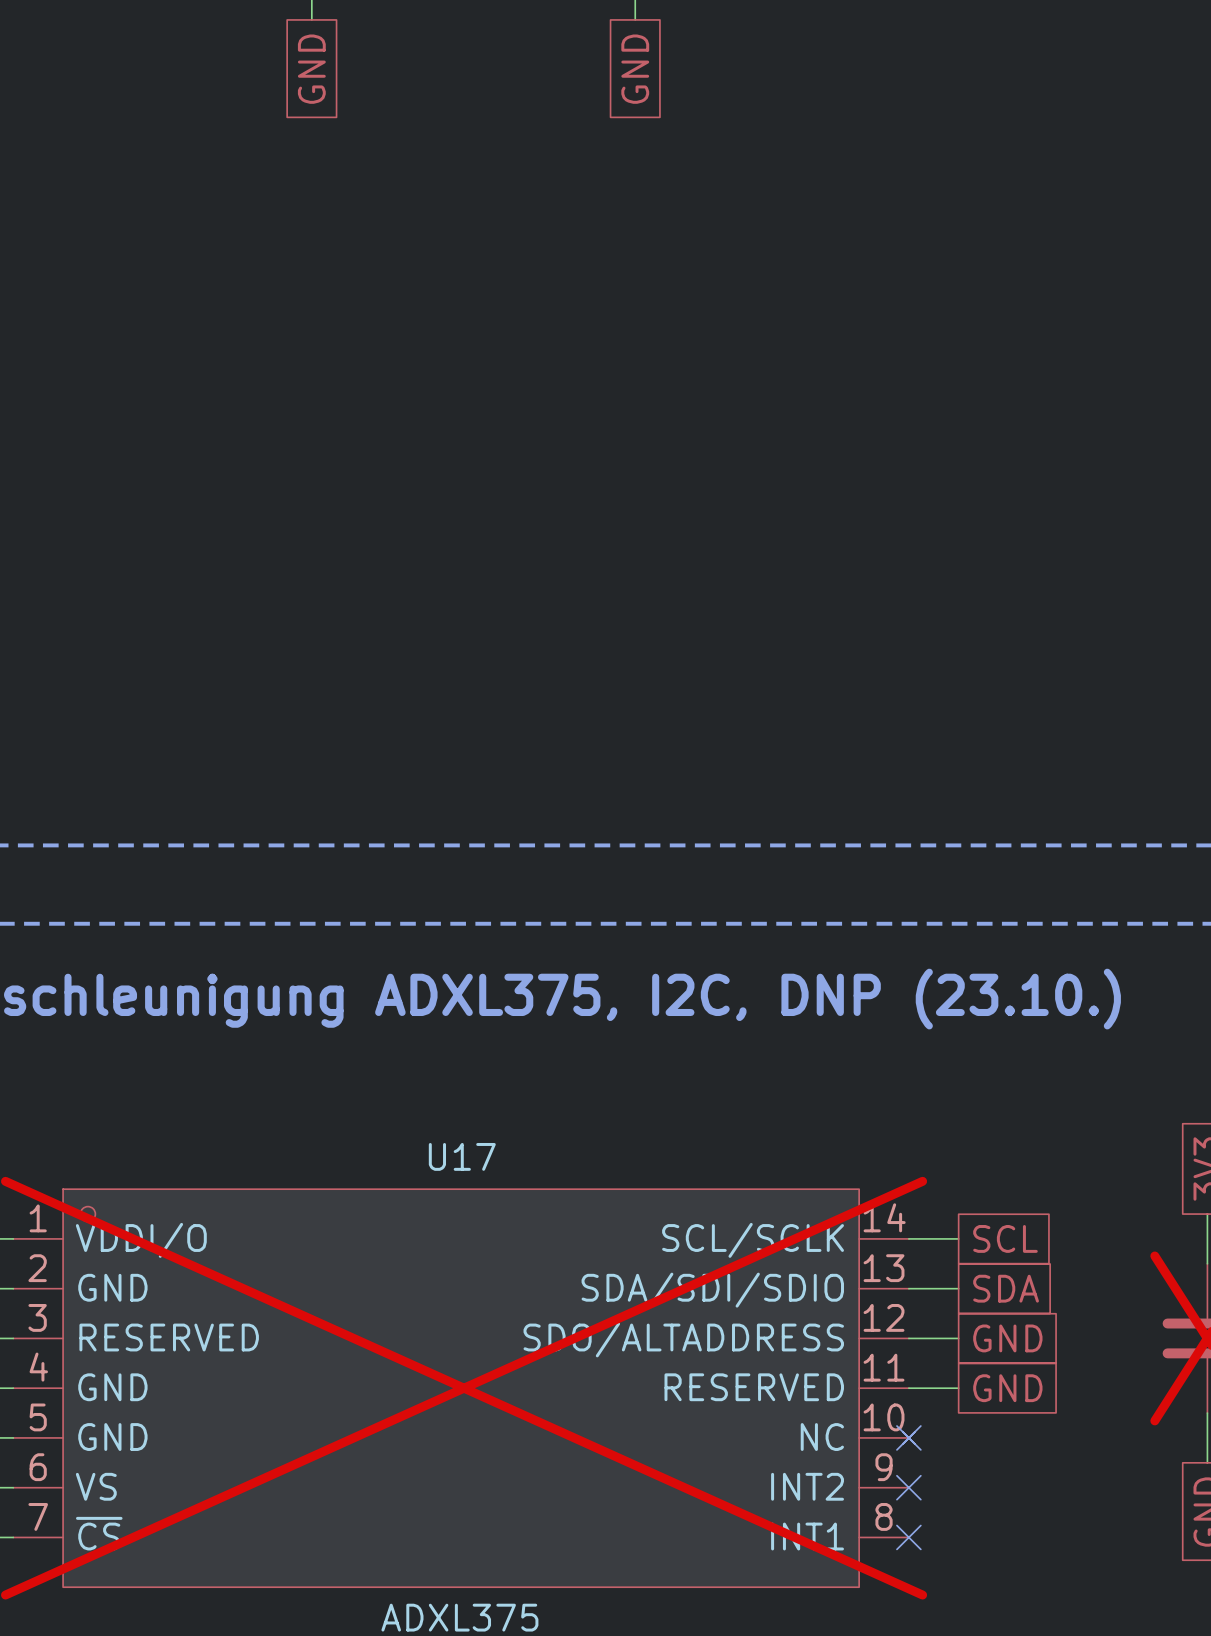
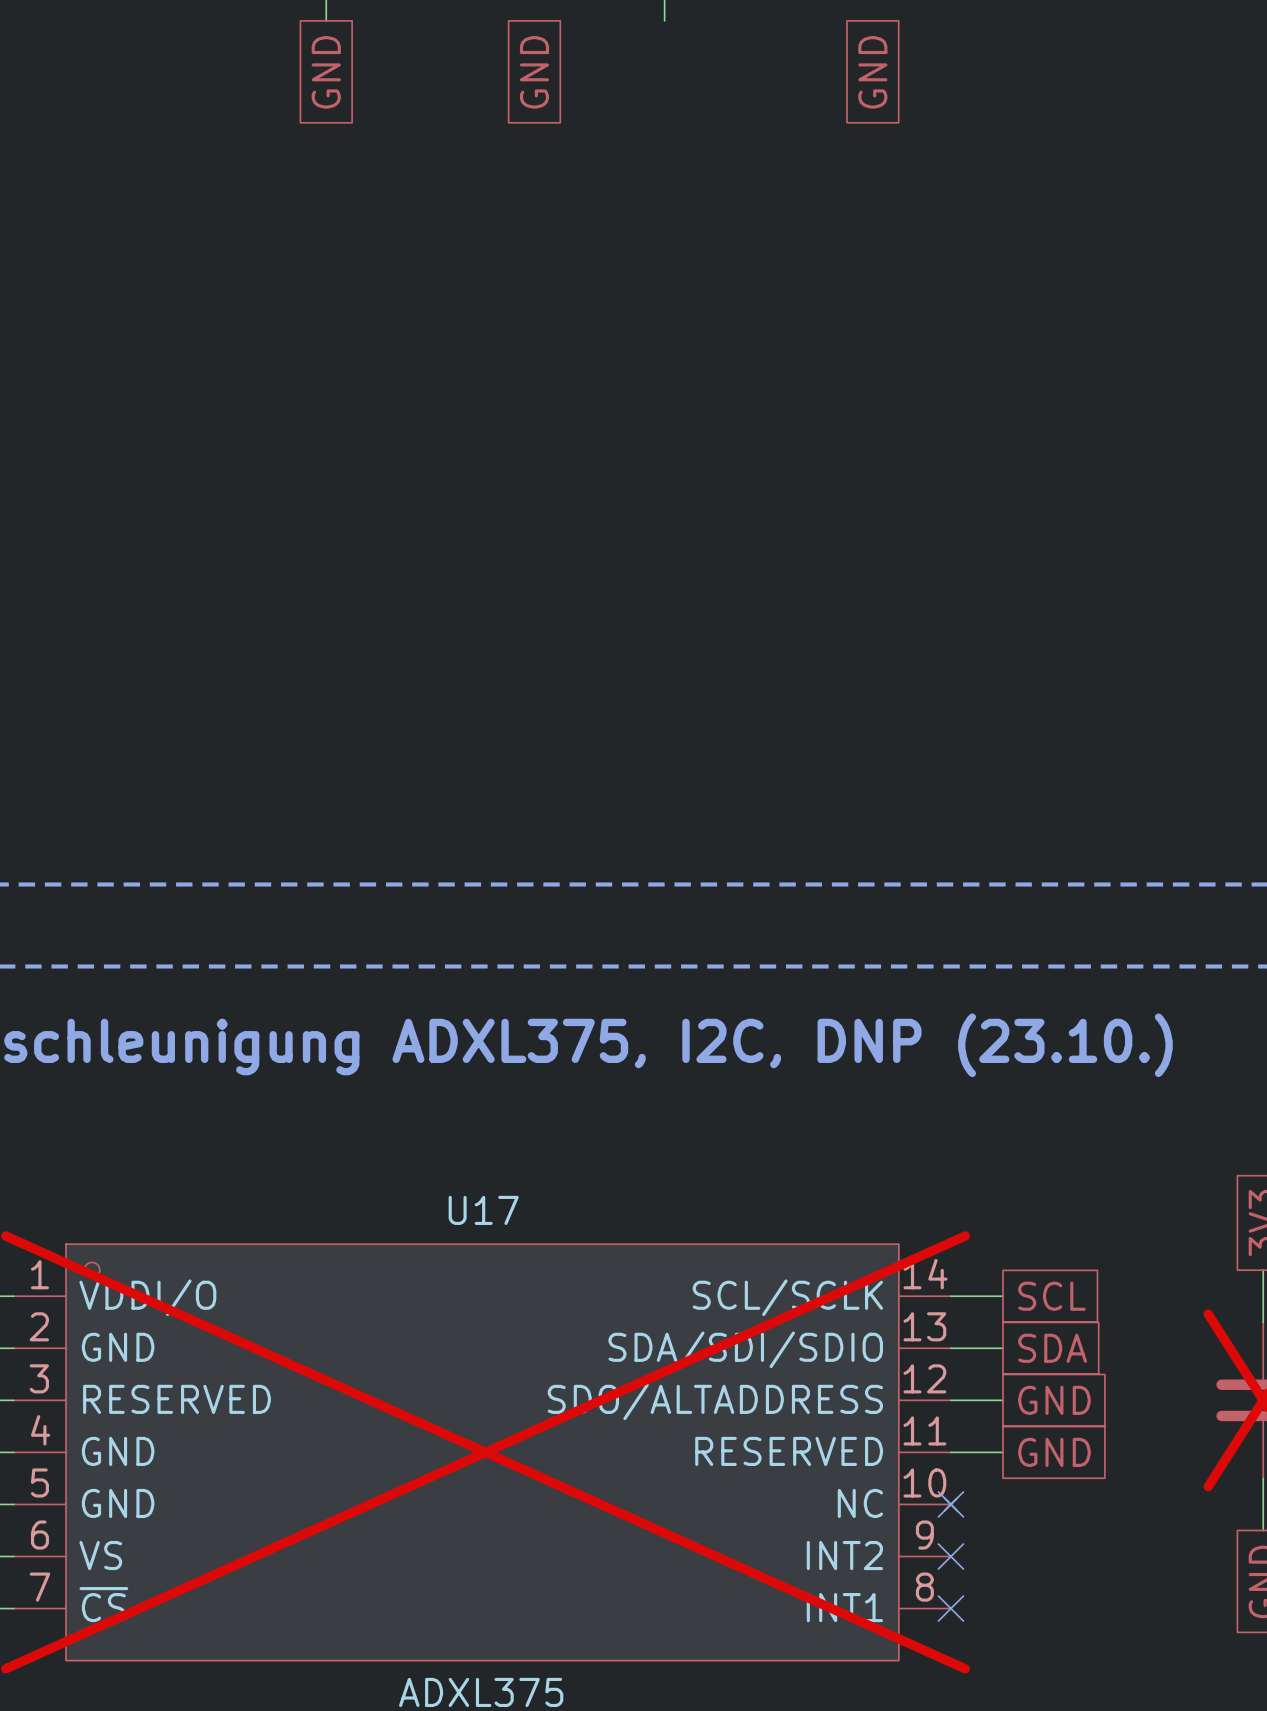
global label: none -> GND (534, 72)
global label: GND (635, 69) -> none
global label: none -> GND (872, 72)

